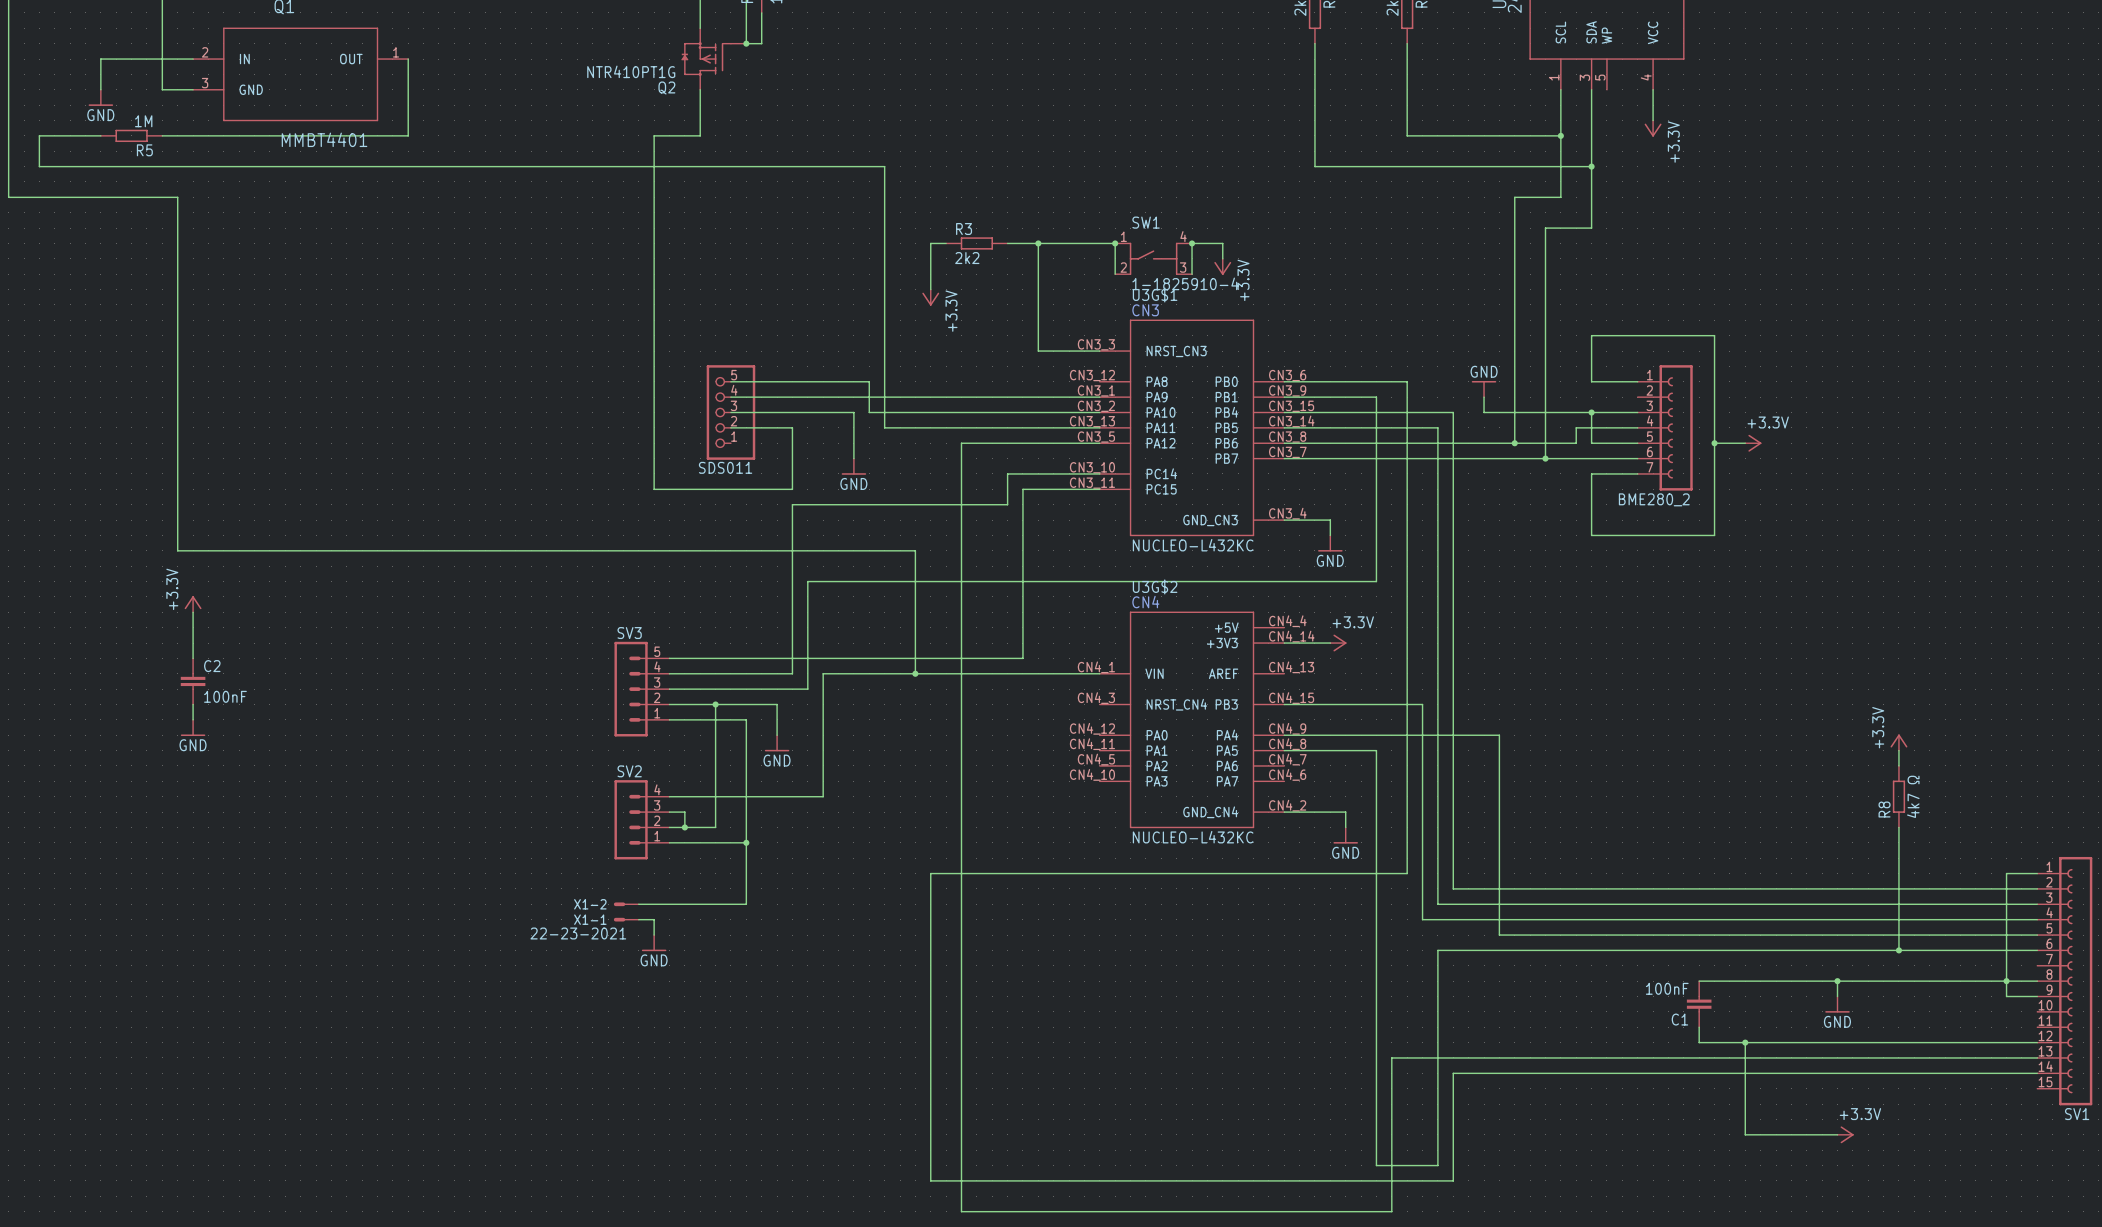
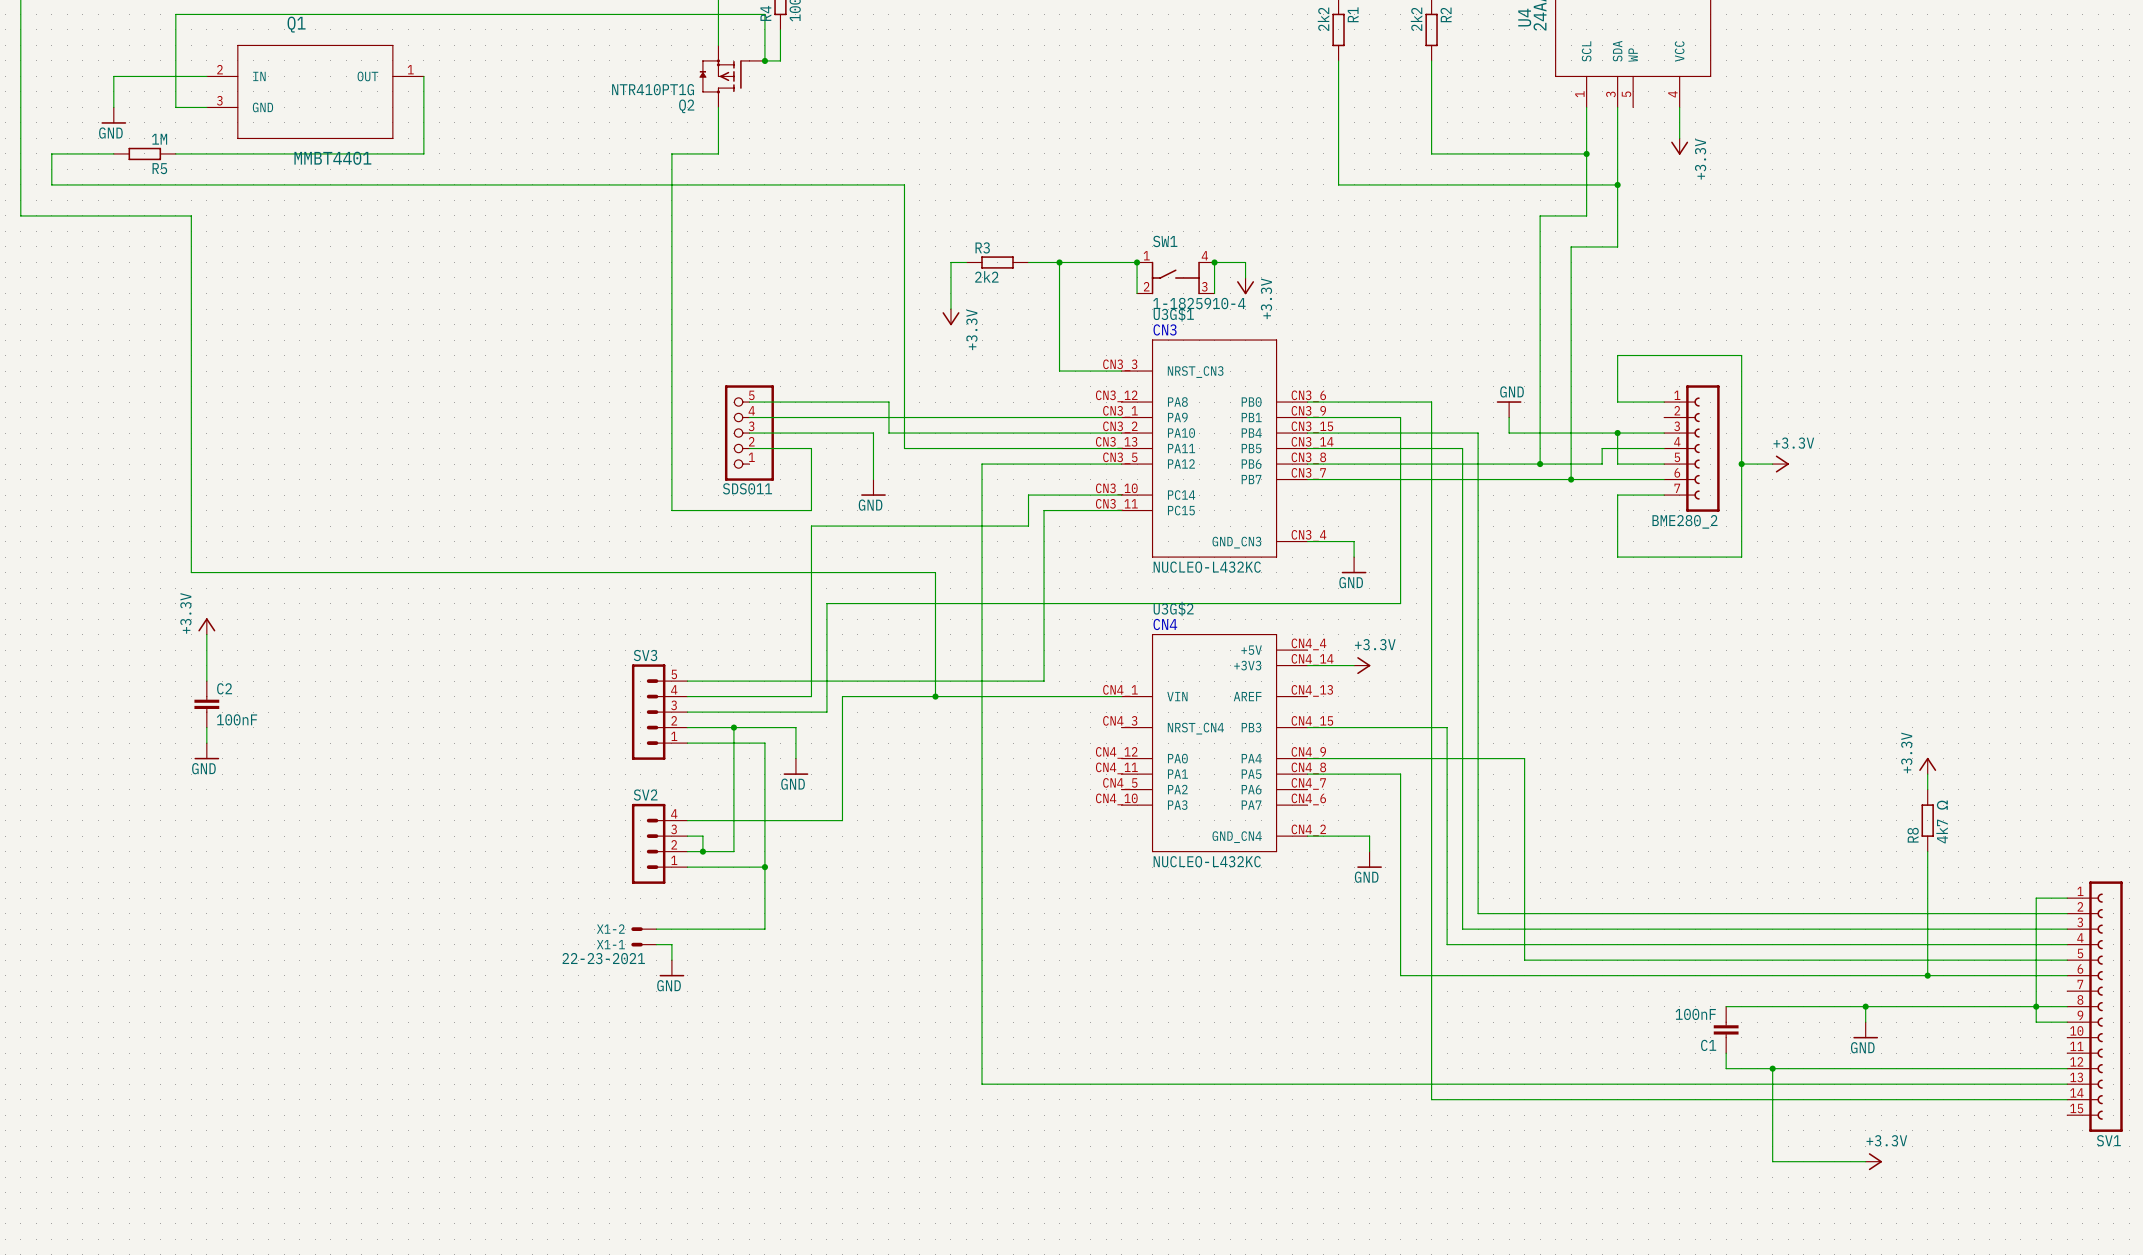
wire: (1407, 873) (930, 873) (930, 1180) (1453, 1180) (1453, 1073) -> (1431, 898) (1431, 1099) (1478, 1099)
wire: (1376, 950) (1376, 1165) (1437, 1165) (1437, 950) -> (1400, 975) (1462, 975)
wire: (961, 1057) (961, 1211) (1391, 1211) (1391, 1057) -> (982, 1084) (1416, 1084)

